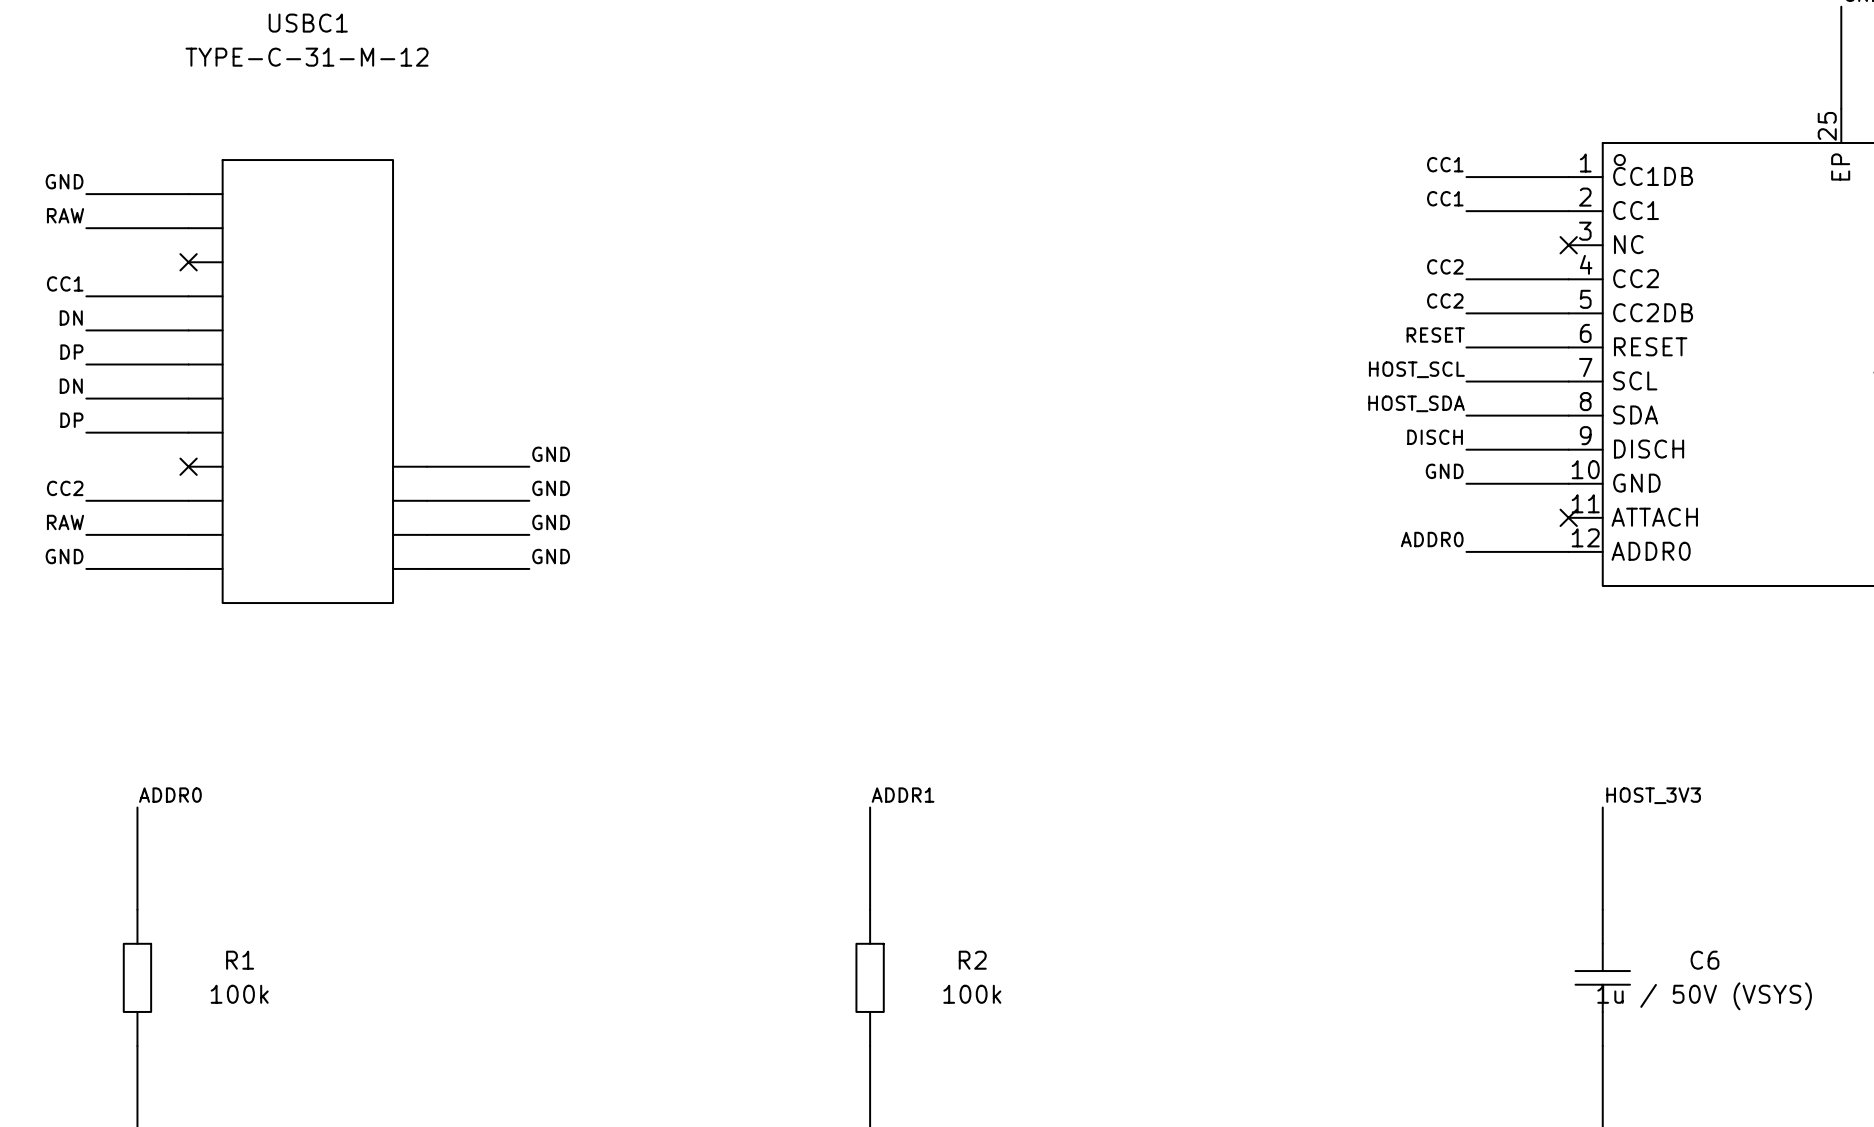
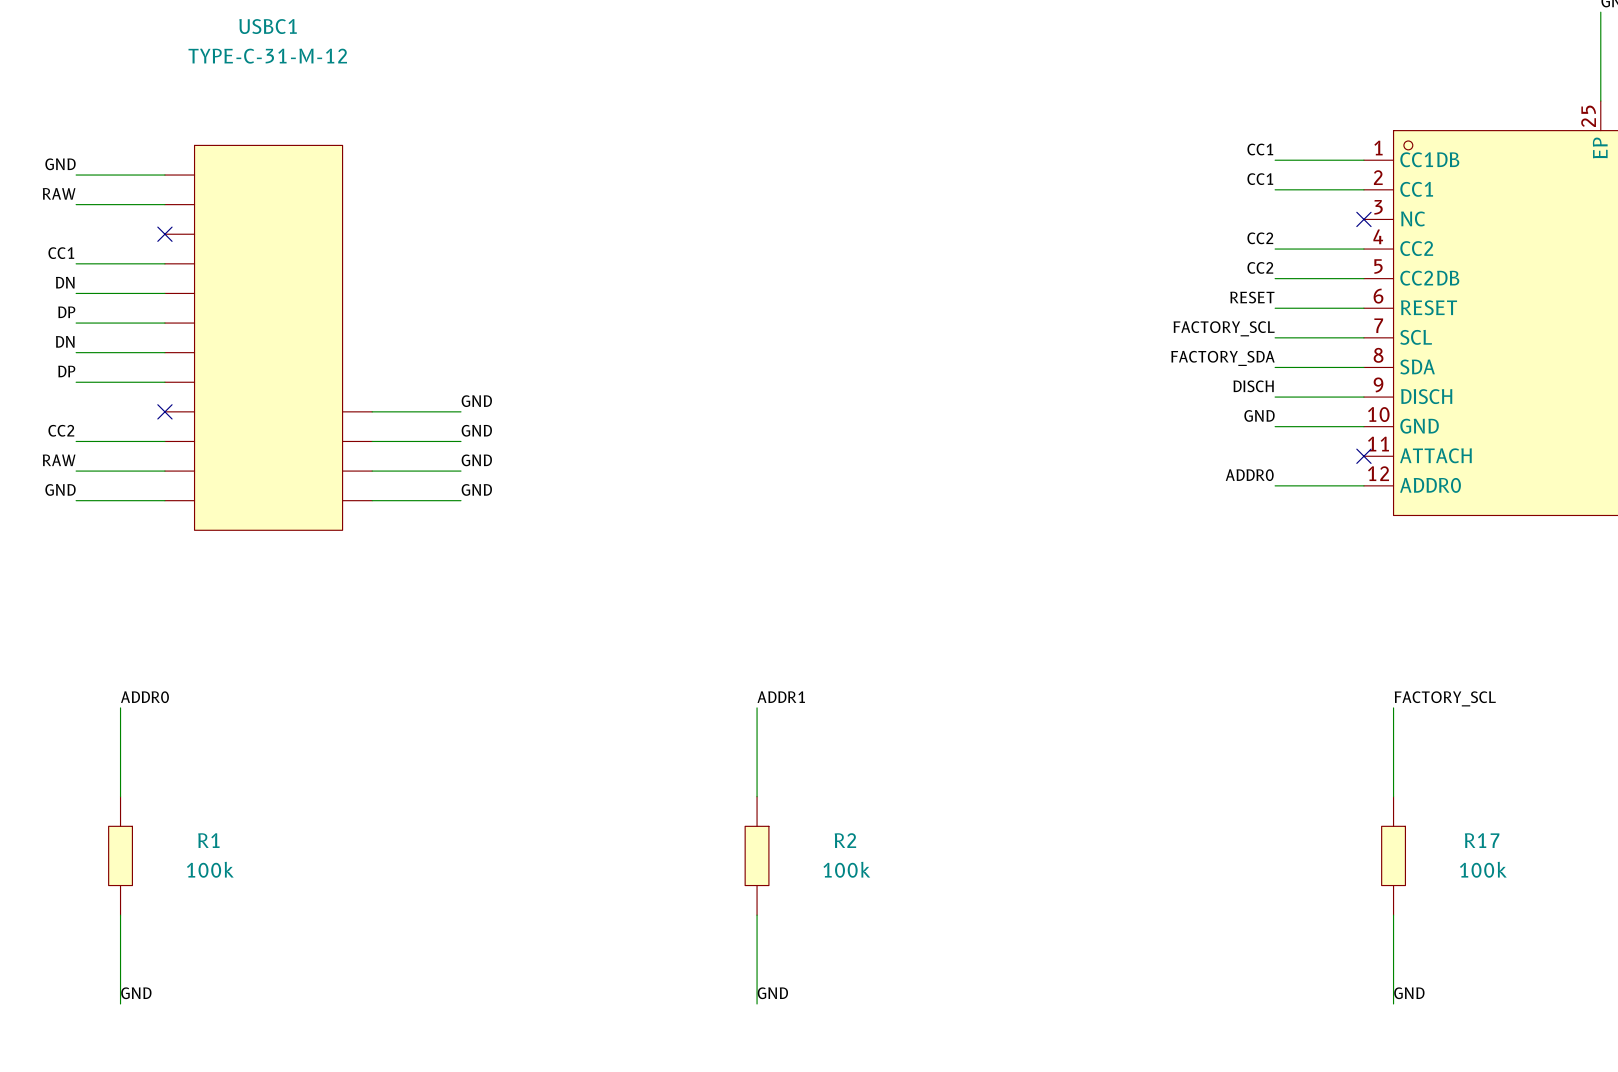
label: HOST_SCL (1416, 369) -> FACTORY_SCL (1224, 328)
label: HOST_SDA (1416, 403) -> FACTORY_SDA (1222, 358)
label: HOST_3V3 (1653, 795) -> FACTORY_SCL (1445, 698)
C6: 1u / 50V (VSYS) (1602, 977) -> none
R17: none -> 100k (1393, 855)

